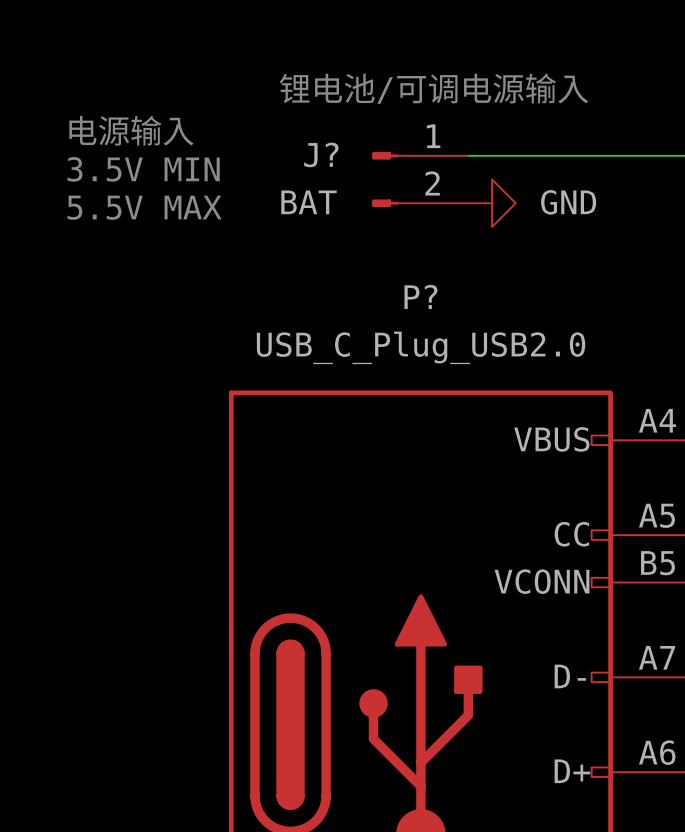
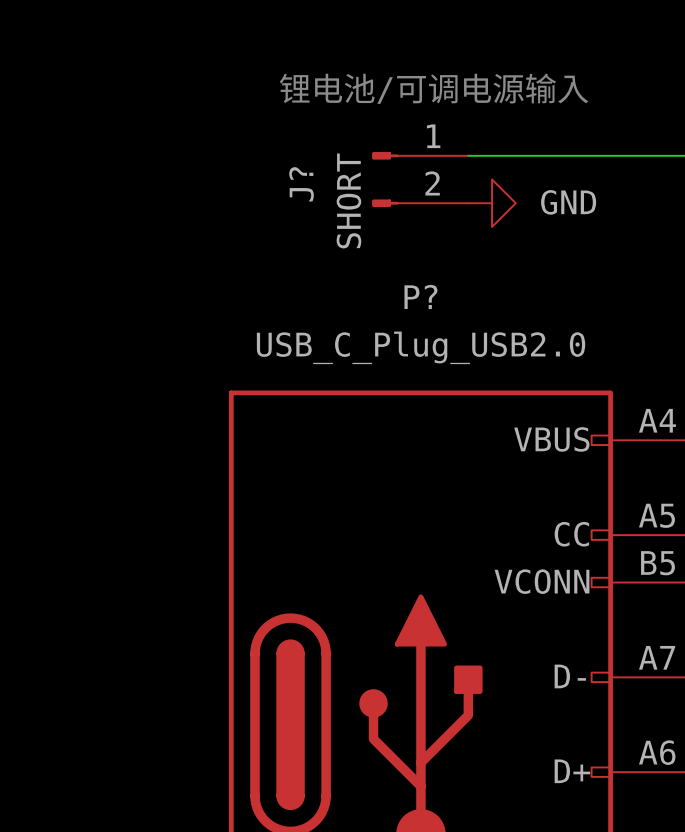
text: 电源输入 (131, 130) -> none
J? name rotation: 0° (321, 154) -> 90° counterclockwise (301, 184)
text: 3.5V MIN (143, 169) -> none
J? value: BAT (309, 202) -> SHORT (348, 200)
text: 5.5V MAX (144, 207) -> none

